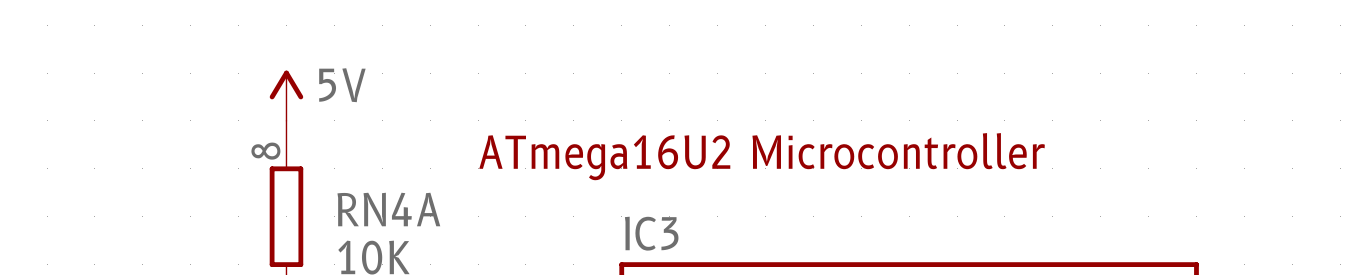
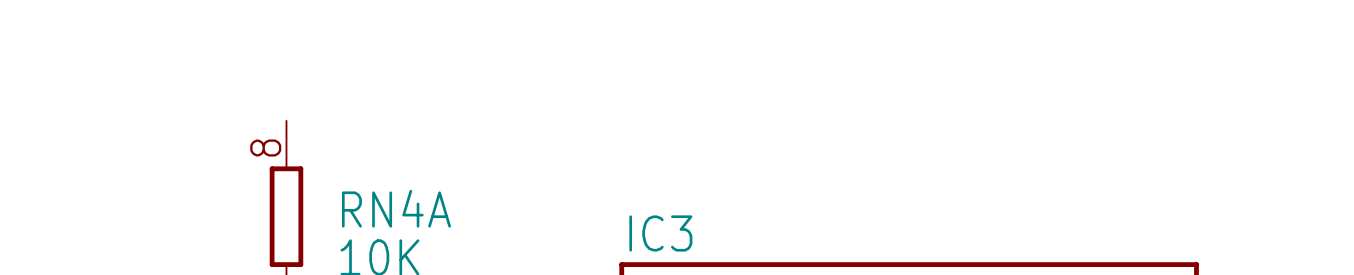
power symbol: 5V (286, 95) -> none
text: ATmega16U2 Microcontroller (762, 156) -> none

